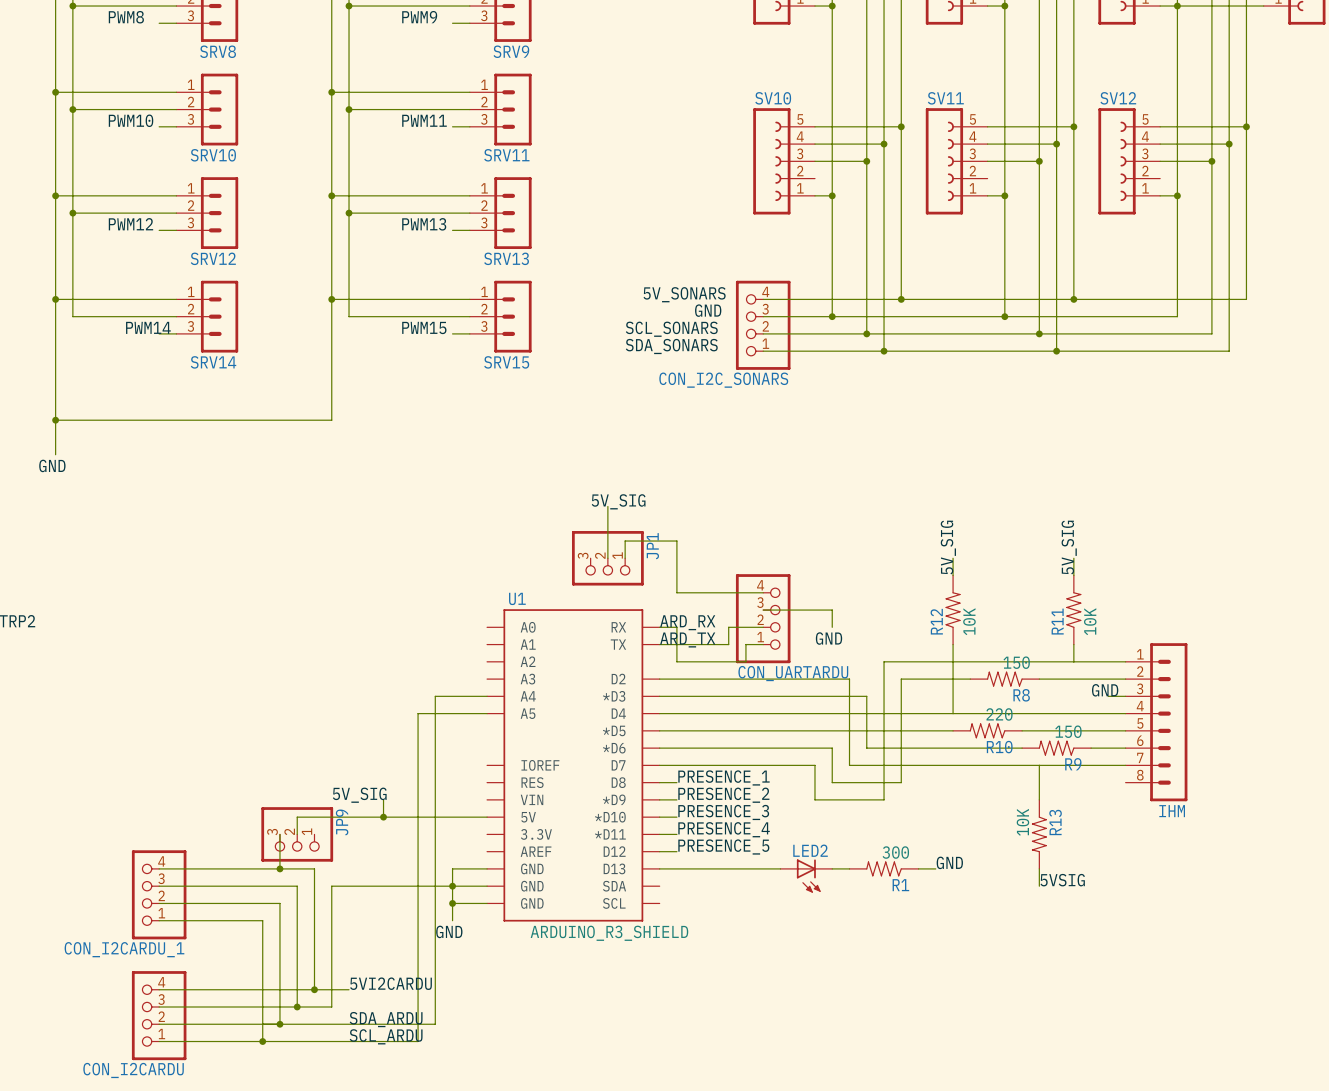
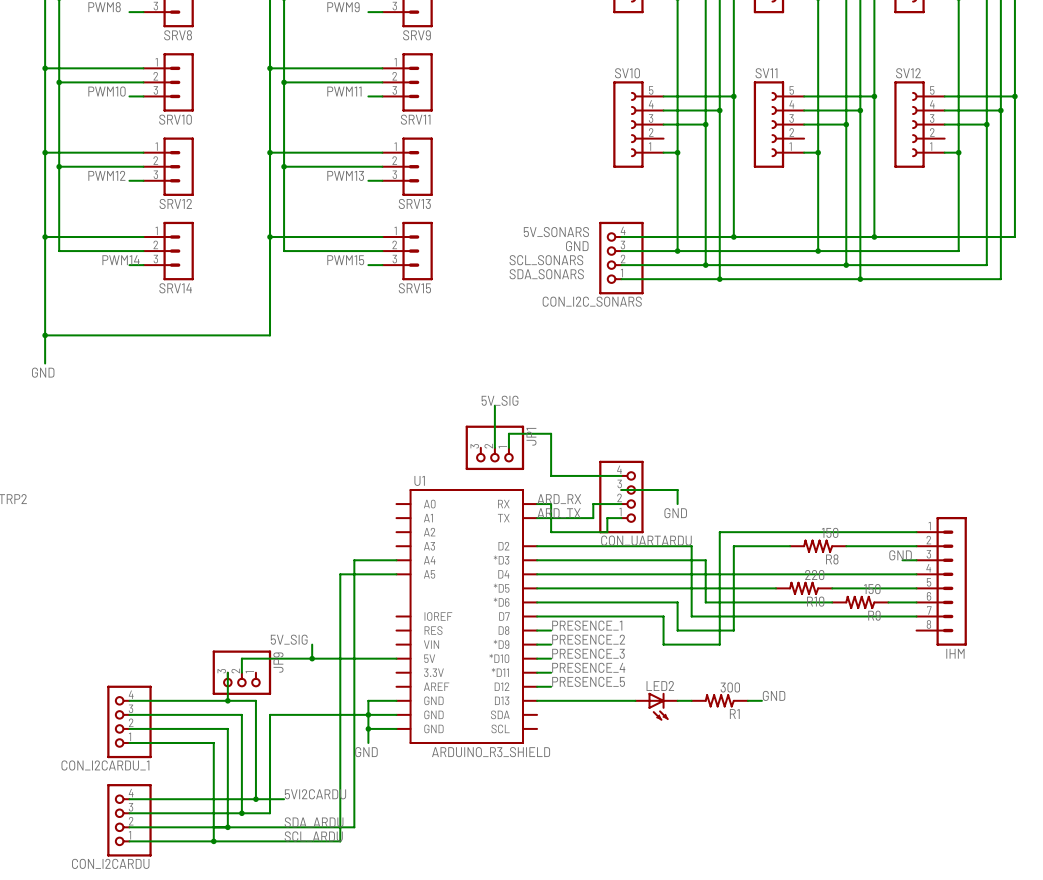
label: 5V_SIG (948, 547) -> none
label: 5V_SIG (1069, 547) -> none
wire: (953, 558) (953, 575) -> none
wire: (1073, 558) (1073, 575) -> none
R12: 10K (953, 610) -> none
R11: 10K (1073, 610) -> none
wire: (953, 644) (953, 713) -> none
wire: (1073, 644) (1073, 661) -> none
wire: (1039, 765) (1039, 799) -> none
R13: 10K (1039, 834) -> none
wire: (1039, 868) (1039, 886) -> none
label: 5VSIG (1062, 880) -> none

